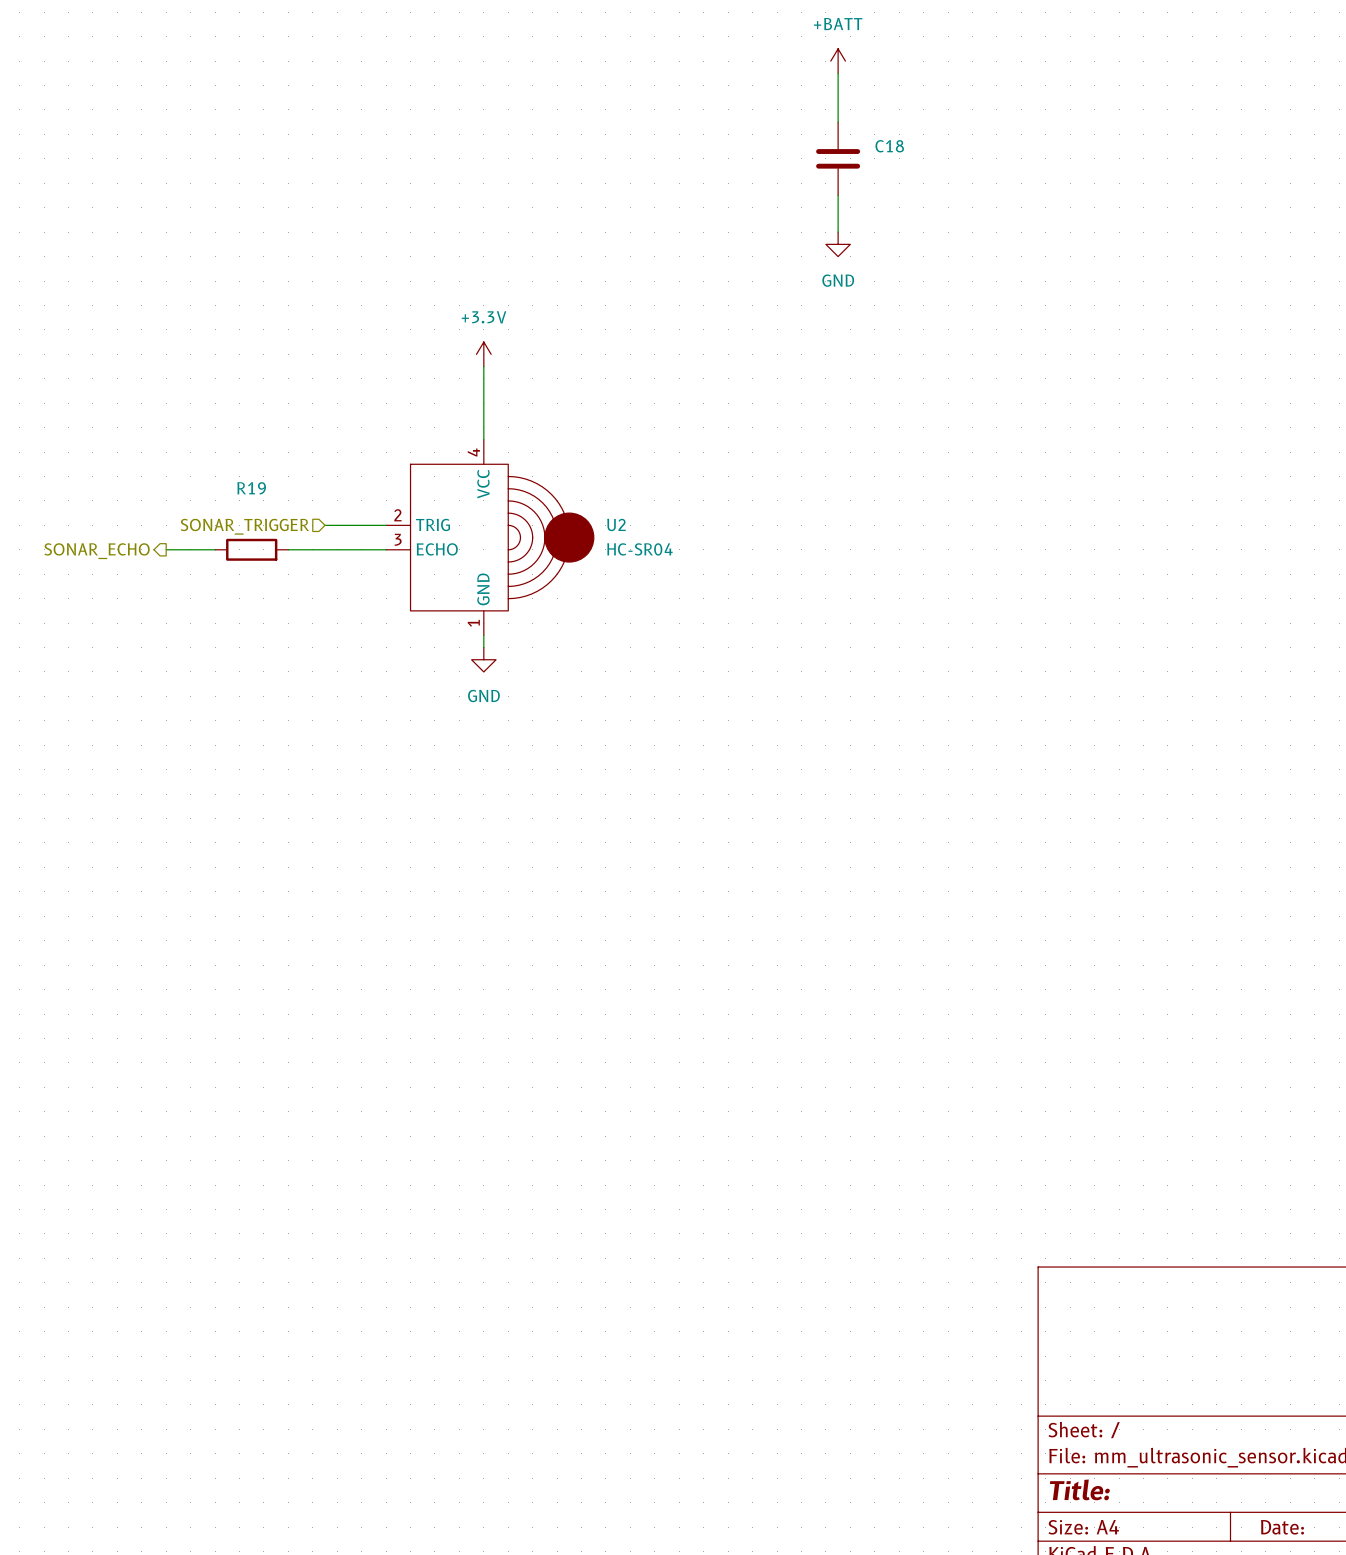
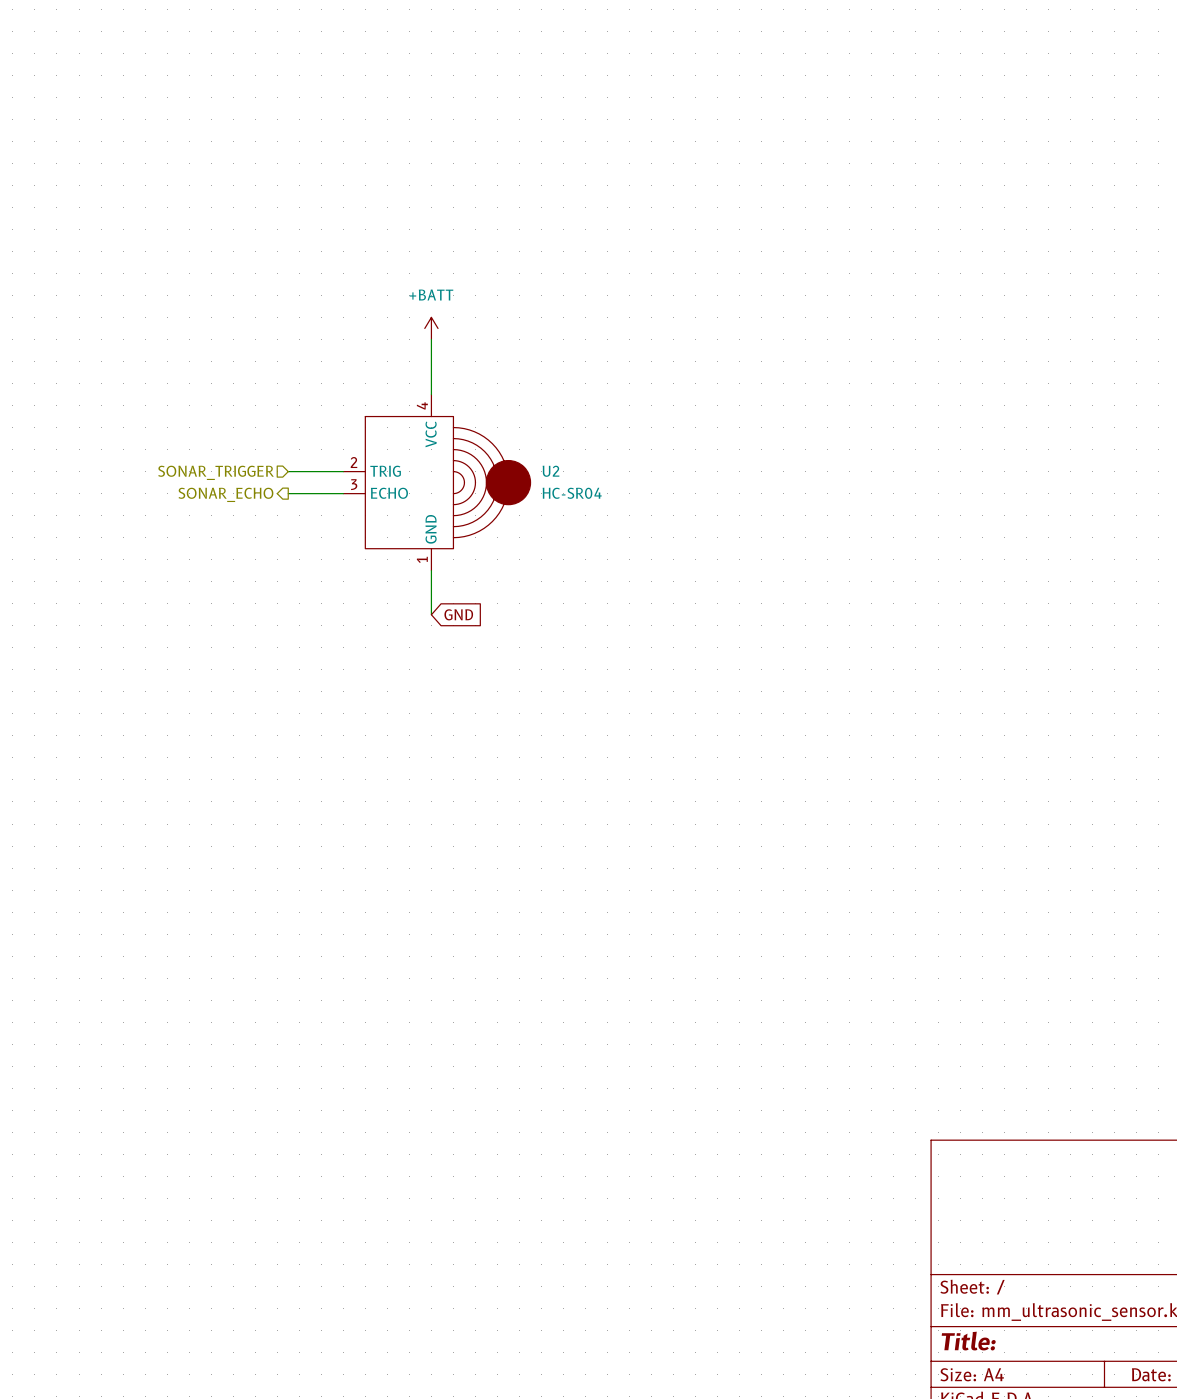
power symbol: +BATT (838, 61) -> none
wire: (838, 73) (838, 122) -> none
C18: (838, 158) -> none
wire: (838, 195) (838, 232) -> none
power symbol: GND (838, 244) -> none
power symbol: +3.3V (483, 354) -> none
power symbol: none -> +BATT (431, 328)
wire: (166, 549) (215, 549) -> none
R19: (251, 549) -> none
wire: (288, 549) (325, 549) -> none
hierarchical label position: SONAR_ECHO (97, 551) -> SONAR_ECHO (225, 494)
wire: none -> (431, 581) (431, 614)
power symbol: GND (483, 659) -> none
global label: none -> GND (458, 614)

